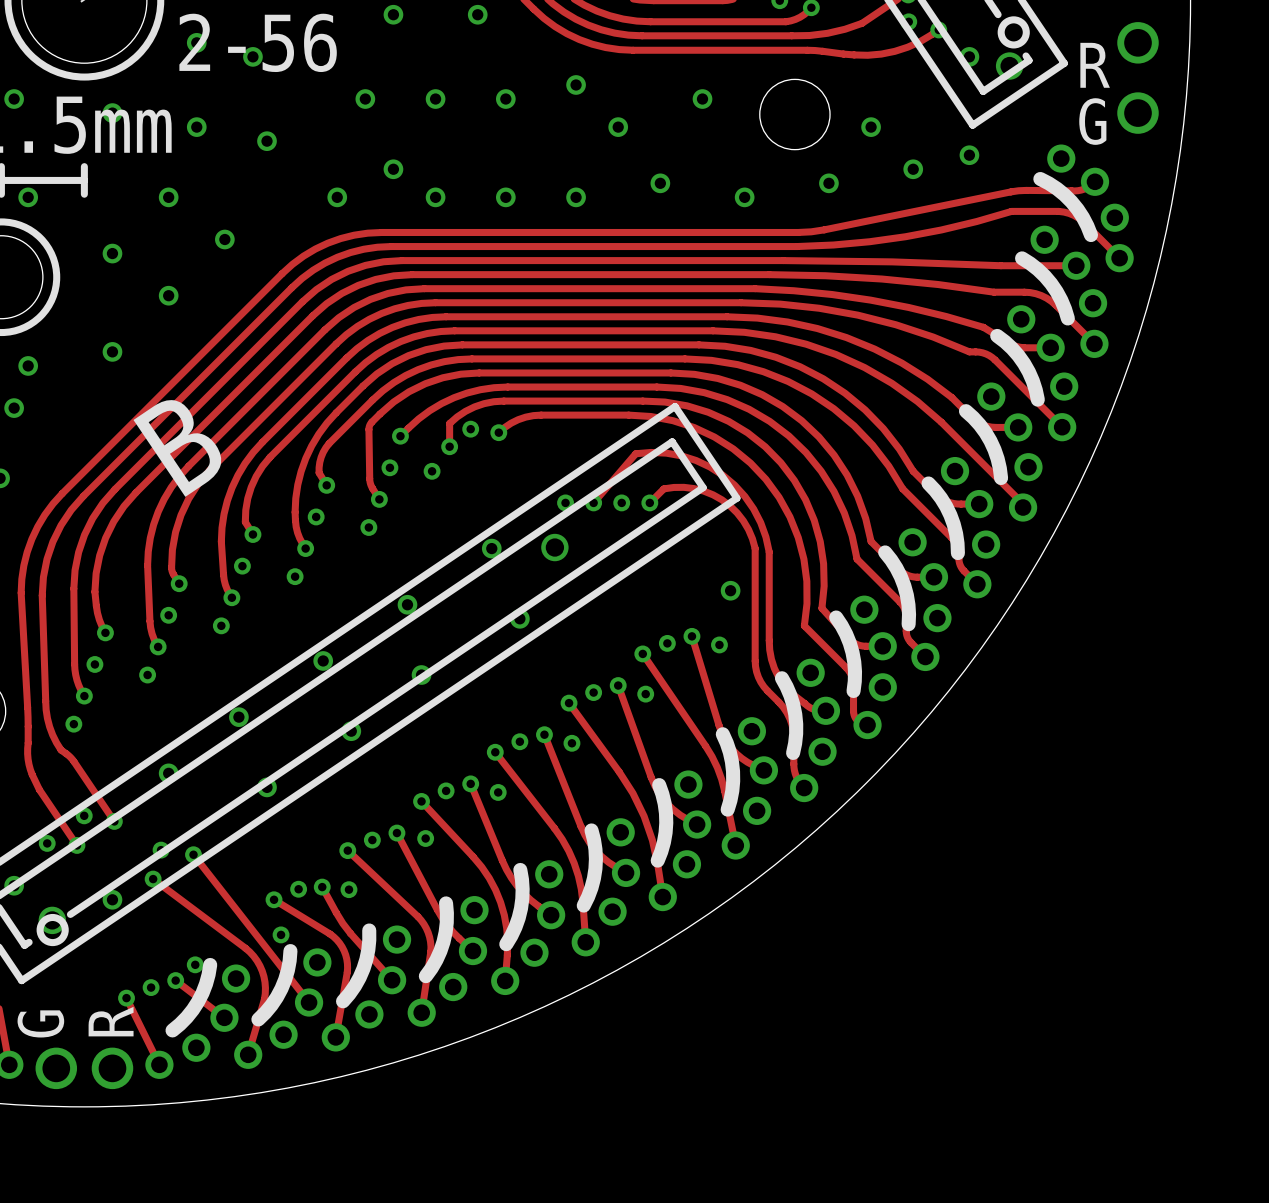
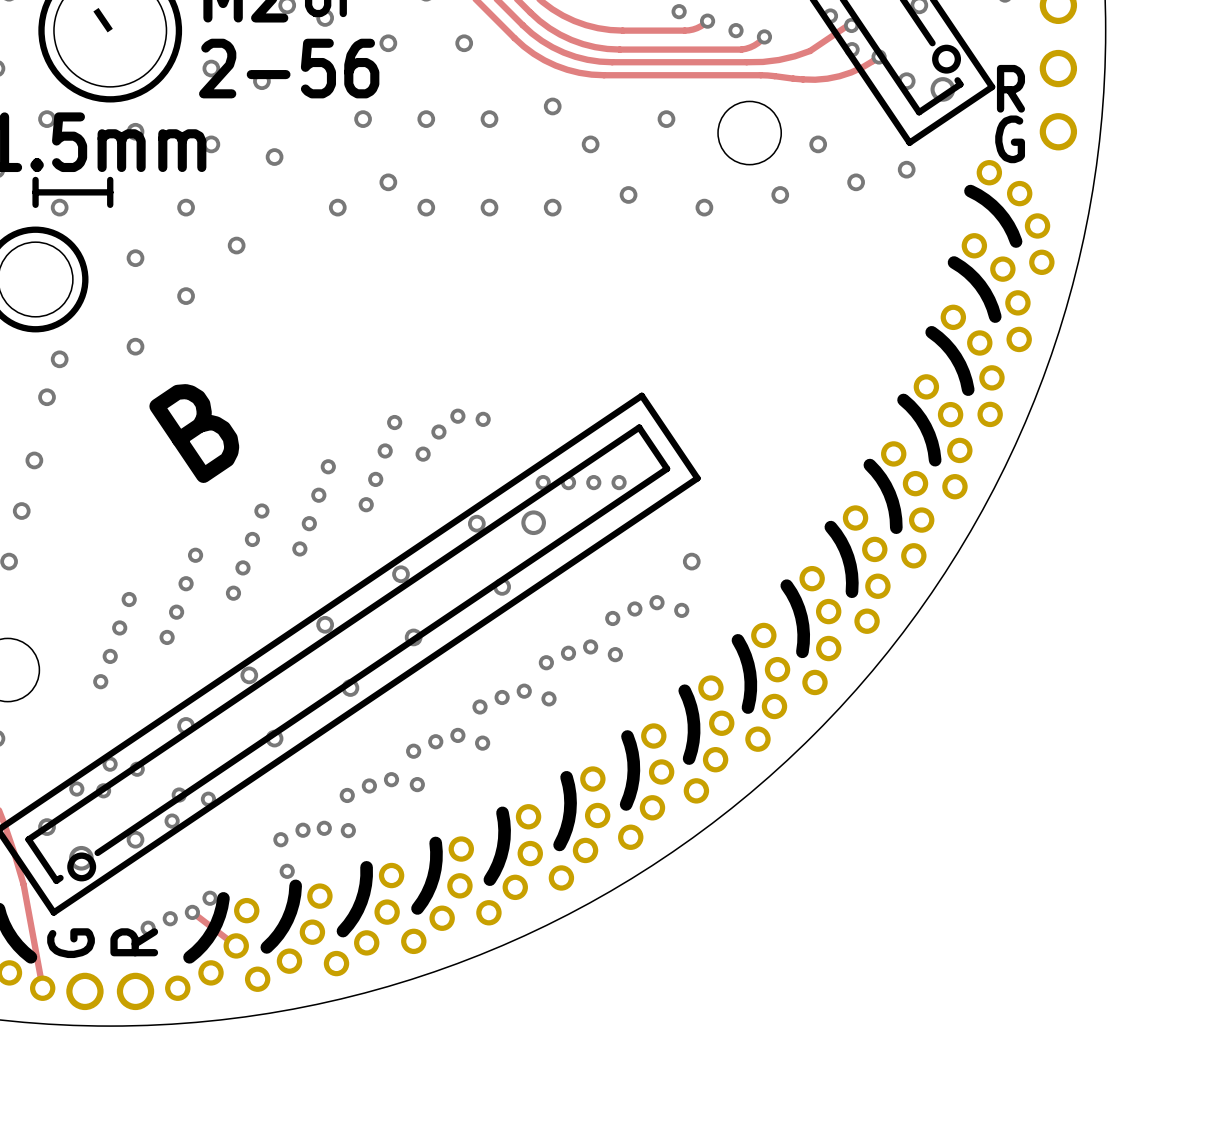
track: (1095, 181) (1087, 187) (1078, 190) (1010, 191) (811, 231) (381, 232) (340, 238) (303, 256) (282, 273) (62, 493) (44, 514) (31, 539) (23, 565) (21, 592) (28, 717) (28, 759) (32, 774) (39, 789) (76, 845) -> none
track: (1119, 258) (1082, 221) (1073, 215) (1058, 211) (1011, 211) (976, 221) (905, 236) (833, 244) (391, 246) (363, 249) (325, 263) (291, 287) (83, 496) (61, 525) (52, 541) (43, 577) (42, 595) (47, 718) (52, 734) (61, 750) (72, 759) (114, 821) -> none
track: (1076, 265) (783, 260) (401, 260) (365, 265) (348, 271) (331, 279) (302, 301) (114, 489) (92, 518) (78, 552) (73, 588) (74, 669) (78, 685) (84, 696) -> none
track: (1094, 343) (1051, 301) (1035, 293) (994, 292) (881, 279) (769, 274) (412, 274) (375, 279) (341, 293) (312, 315) (123, 506) (105, 538) (96, 573) (96, 605) (99, 619) (105, 632) -> none
track: (1050, 347) (1016, 346) (983, 327) (908, 307) (870, 300) (793, 290) (755, 288) (424, 288) (387, 293) (354, 307) (324, 329) (188, 466) (171, 487) (158, 511) (148, 551) (149, 621) (152, 633) (158, 646) -> none
track: (1018, 427) (991, 427) (982, 424) (971, 417) (951, 397) (901, 363) (846, 337) (787, 322) (727, 316) (446, 316) (418, 319) (379, 333) (356, 348) (262, 442) (245, 463) (227, 500) (222, 527) (224, 580) (231, 597) -> none
track: (1062, 427) (989, 355) (979, 352) (969, 351) (895, 324) (857, 315) (819, 308) (741, 302) (435, 302) (408, 305) (381, 313) (346, 334) (198, 483) (181, 515) (175, 532) (171, 568) (179, 583) -> none
track: (498, 432) (518, 419) (533, 415) (651, 416) (694, 427) (733, 448) (765, 479) (789, 516) (803, 559) (806, 581) (804, 625) (850, 672) (853, 682) (854, 714) (859, 722) (867, 725) -> none
track: (400, 436) (418, 418) (441, 403) (467, 393) (494, 387) (656, 387) (704, 392) (727, 399) (749, 409) (788, 435) (821, 471) (844, 513) (857, 559) (901, 604) (906, 614) (907, 637) (925, 656) -> none
track: (449, 446) (449, 423) (465, 411) (493, 401) (665, 402) (708, 412) (728, 421) (747, 432) (780, 462) (805, 499) (820, 541) (824, 586) (821, 608) (854, 643) (862, 646) (882, 646) -> none
track: (326, 485) (319, 472) (319, 467) (321, 457) (329, 443) (382, 390) (405, 375) (431, 364) (471, 358) (711, 360) (763, 371) (788, 381) (811, 393) (854, 425) (872, 445) (902, 488) (953, 539) (957, 548) (961, 567) (977, 584) -> none
track: (379, 499) (369, 480) (369, 425) (393, 402) (425, 383) (442, 377) (479, 372) (694, 374) (740, 385) (762, 394) (801, 420) (834, 455) (847, 475) (857, 496) (871, 541) (905, 574) (914, 577) (933, 577) -> none
track: (593, 502) (635, 453) (666, 453) (681, 455) (709, 467) (734, 485) (753, 509) (765, 537) (769, 552) (769, 640) (774, 668) (789, 691) (811, 708) (825, 710) -> none
track: (649, 502) (663, 488) (683, 487) (703, 491) (729, 505) (748, 529) (755, 548) (756, 671) (763, 686) (783, 707) (789, 718) (793, 731) (794, 770) (803, 787) -> none
track: (979, 504) (953, 503) (940, 498) (913, 471) (883, 428) (865, 409) (823, 378) (775, 357) (750, 350) (698, 344) (444, 346) (408, 355) (376, 373) (336, 412) (318, 434) (305, 458) (295, 498) (296, 526) (305, 548) -> none
track: (1023, 507) (1023, 503) (941, 422) (917, 401) (864, 367) (806, 344) (775, 336) (713, 330) (454, 330) (413, 336) (376, 354) (355, 371) (270, 457) (256, 476) (247, 498) (245, 522) (252, 534) -> none
track: (691, 636) (724, 738) (741, 758) (763, 770) -> none
track: (642, 653) (712, 756) (721, 779) (735, 845) -> none
track: (618, 685) (655, 786) (672, 809) (697, 824) -> none
track: (569, 703) (619, 771) (632, 793) (644, 816) (652, 840) (662, 897) -> none
track: (544, 734) (584, 834) (601, 856) (626, 872) -> none
track: (495, 752) (554, 828) (568, 850) (581, 889) (585, 942) -> none
track: (470, 783) (511, 878) (530, 900) (551, 915) -> none
track: (421, 801) (481, 867) (495, 889) (506, 928) (505, 980) -> none
track: (396, 833) (441, 917) (452, 932) (472, 951) -> none
track: (347, 850) (417, 916) (426, 928) (430, 941) (430, 951) (421, 1012) -> none
track: (193, 854) (309, 1002) -> none
track: (153, 879) (245, 948) (259, 965) (265, 982) (265, 993) (248, 1054) -> none
track: (322, 887) (342, 923) (392, 980) -> none
track: (274, 899) (330, 934) (344, 950) (347, 972) (335, 1037) -> none
track: (126, 998) (159, 1064) -> none

